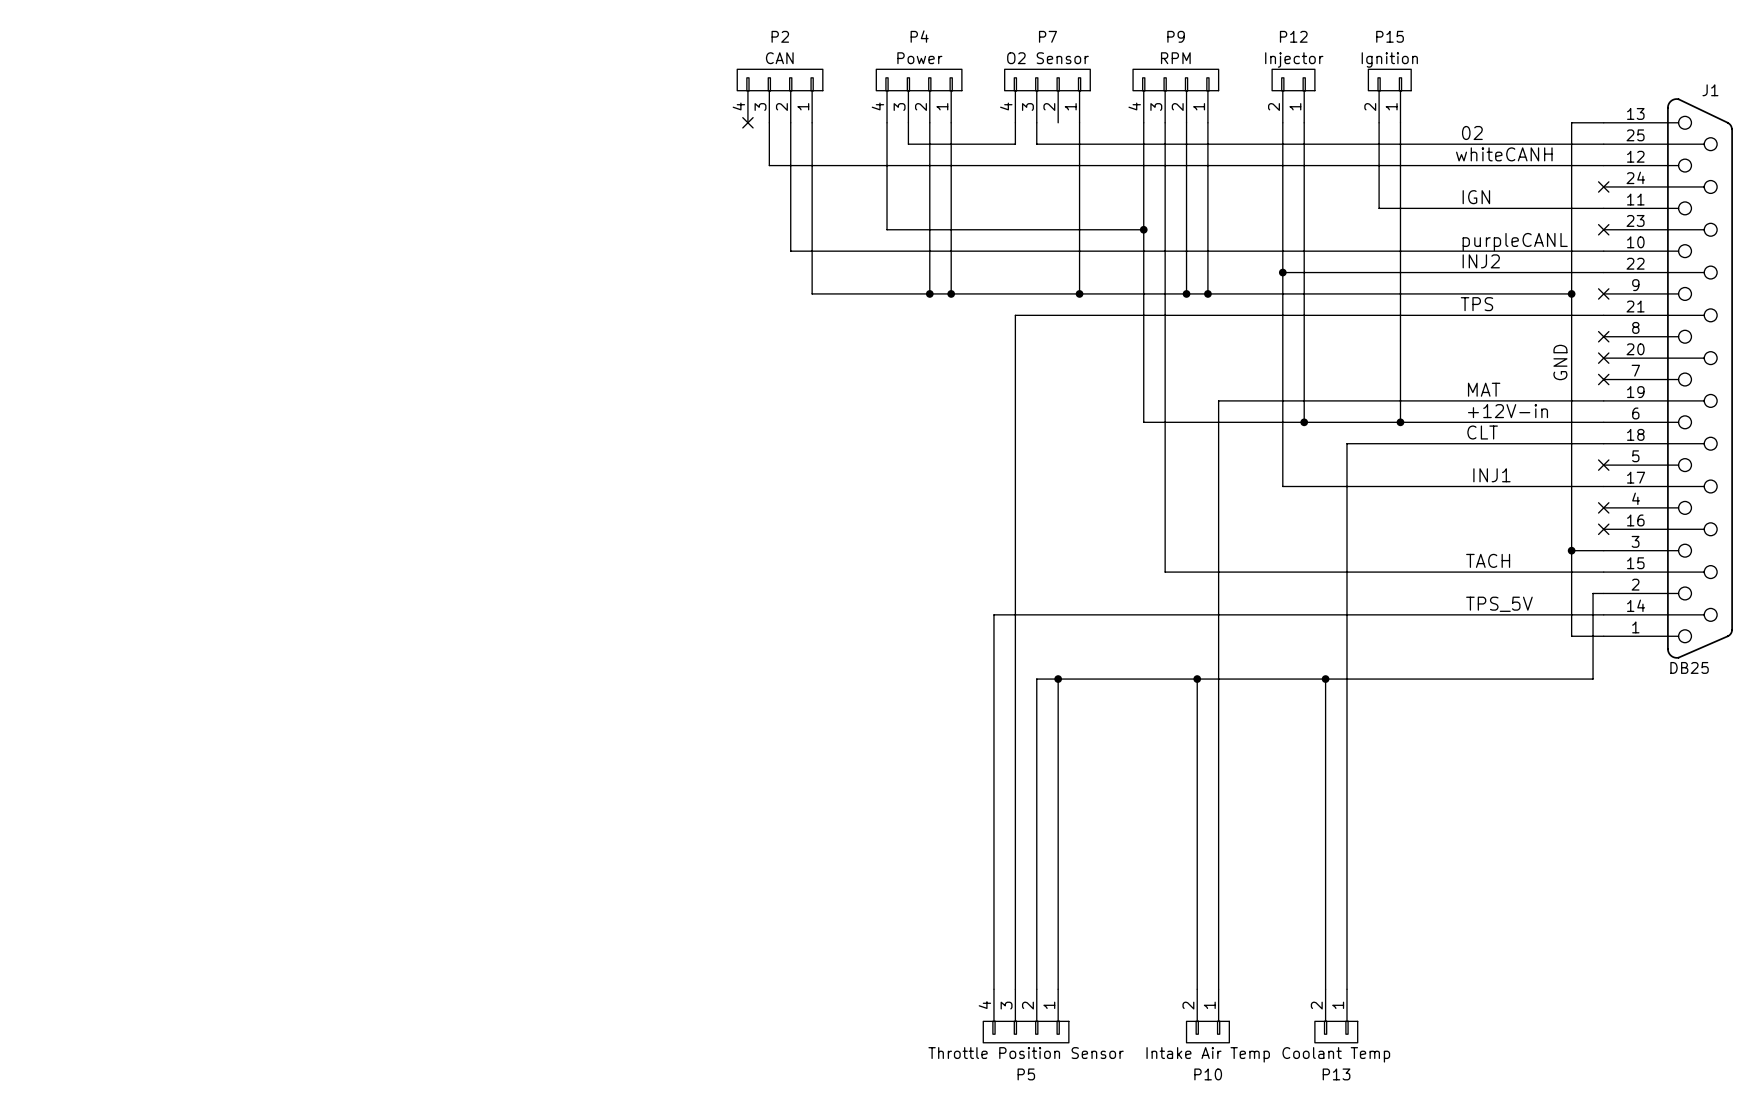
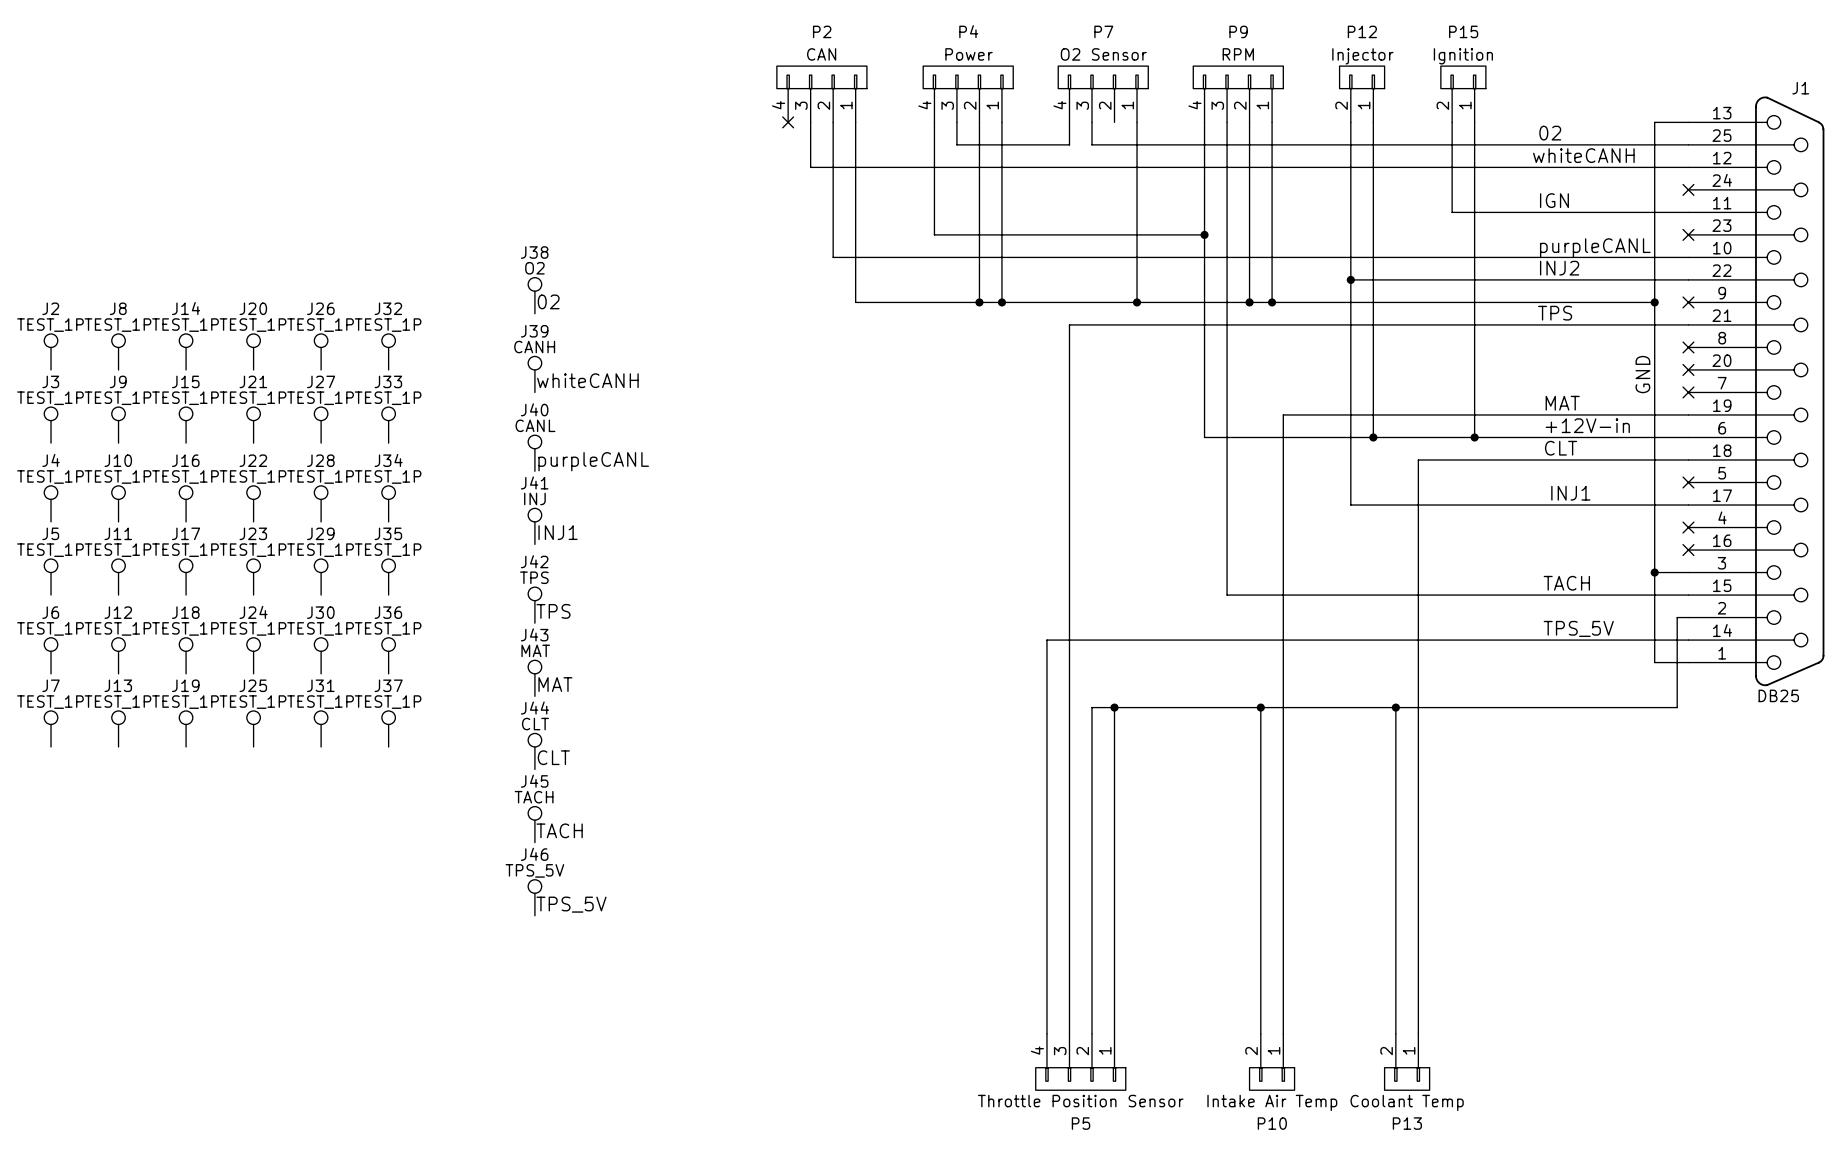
J38: none -> O2 (534, 295)
label: none -> 02 (548, 301)
J2: none -> TEST_1P (51, 351)
J8: none -> TEST_1P (118, 351)
J14: none -> TEST_1P (186, 351)
J20: none -> TEST_1P (253, 351)
J26: none -> TEST_1P (321, 351)
J32: none -> TEST_1P (388, 351)
J39: none -> CANH (534, 374)
label: none -> whiteCANH (587, 380)
J3: none -> TEST_1P (51, 425)
J9: none -> TEST_1P (118, 425)
J15: none -> TEST_1P (186, 425)
J21: none -> TEST_1P (253, 425)
J27: none -> TEST_1P (321, 425)
J33: none -> TEST_1P (388, 425)
J40: none -> CANL (534, 453)
label: none -> purpleCANL (593, 461)
J4: none -> TEST_1P (51, 503)
J10: none -> TEST_1P (118, 503)
J16: none -> TEST_1P (186, 503)
J22: none -> TEST_1P (253, 503)
J28: none -> TEST_1P (321, 503)
J34: none -> TEST_1P (388, 503)
J41: none -> INJ (534, 526)
label: none -> INJ1 (558, 532)
J5: none -> TEST_1P (51, 577)
J11: none -> TEST_1P (118, 577)
J17: none -> TEST_1P (186, 577)
J23: none -> TEST_1P (253, 577)
J29: none -> TEST_1P (321, 577)
J35: none -> TEST_1P (388, 577)
J42: none -> TPS (534, 605)
label: none -> TPS (553, 611)
J6: none -> TEST_1P (51, 655)
J12: none -> TEST_1P (118, 655)
J18: none -> TEST_1P (186, 655)
J24: none -> TEST_1P (253, 655)
J30: none -> TEST_1P (321, 655)
J36: none -> TEST_1P (388, 655)
J43: none -> MAT (534, 678)
label: none -> MAT (555, 684)
J7: none -> TEST_1P (51, 728)
J13: none -> TEST_1P (118, 728)
J19: none -> TEST_1P (186, 728)
J25: none -> TEST_1P (253, 728)
J31: none -> TEST_1P (321, 728)
J37: none -> TEST_1P (388, 728)
J44: none -> CLT (534, 751)
label: none -> CLT (553, 757)
J45: none -> TACH (534, 824)
label: none -> TACH (559, 830)
J46: none -> TPS_5V (534, 897)
label: none -> TPS_5V (571, 904)

